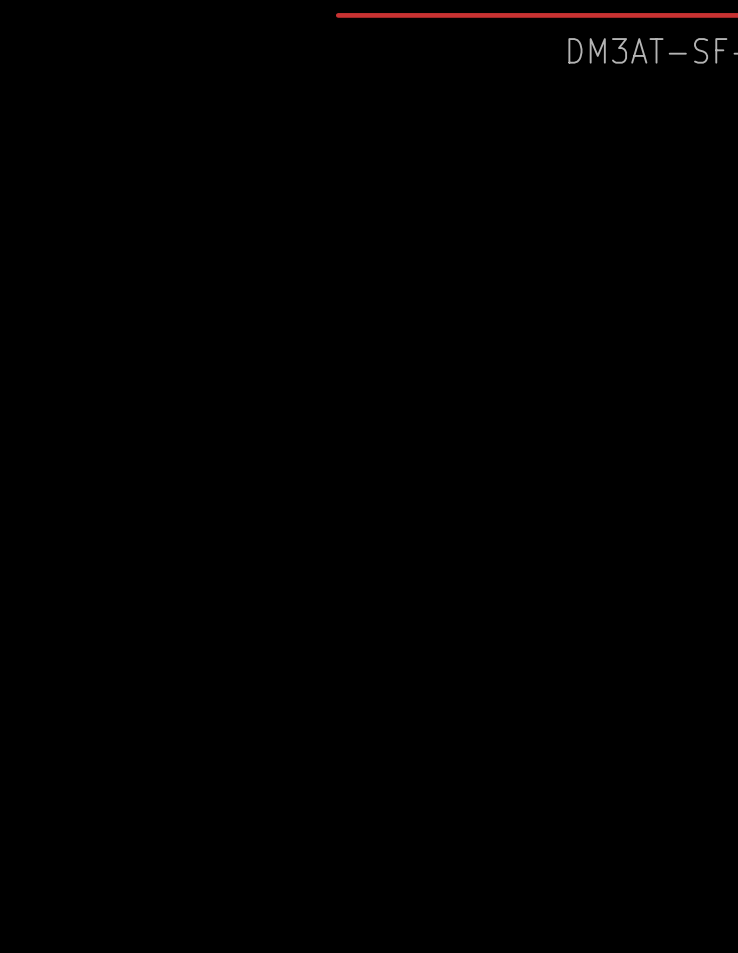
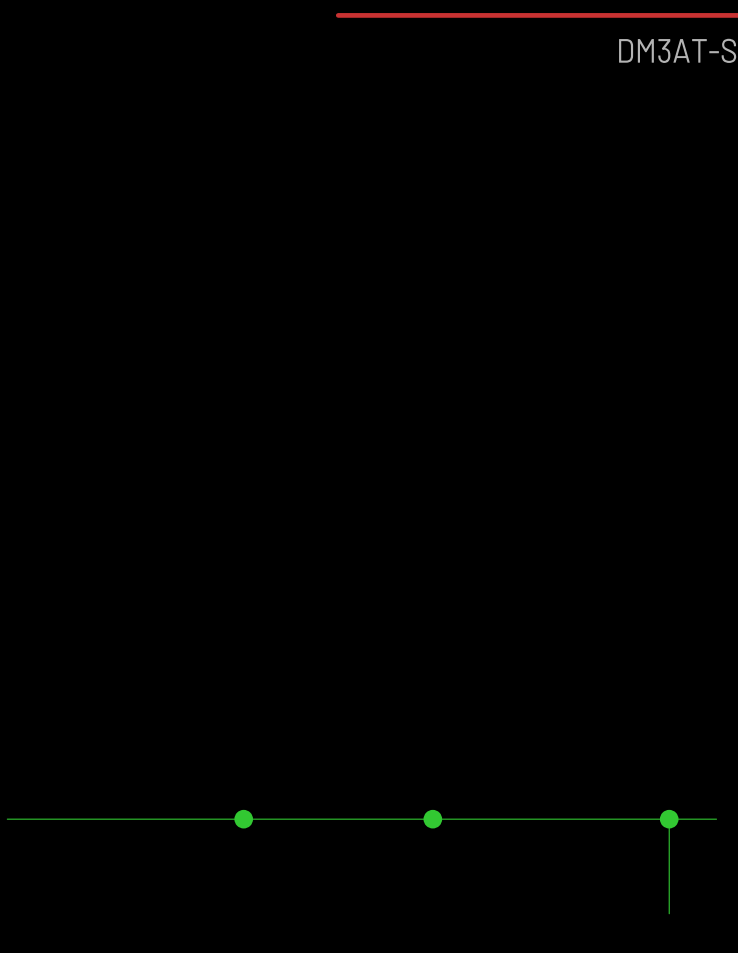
wire: none -> (7, 819) (716, 819)
junction: none -> (243, 819)
junction: none -> (432, 819)
wire: none -> (669, 819) (669, 913)
junction: none -> (669, 819)

